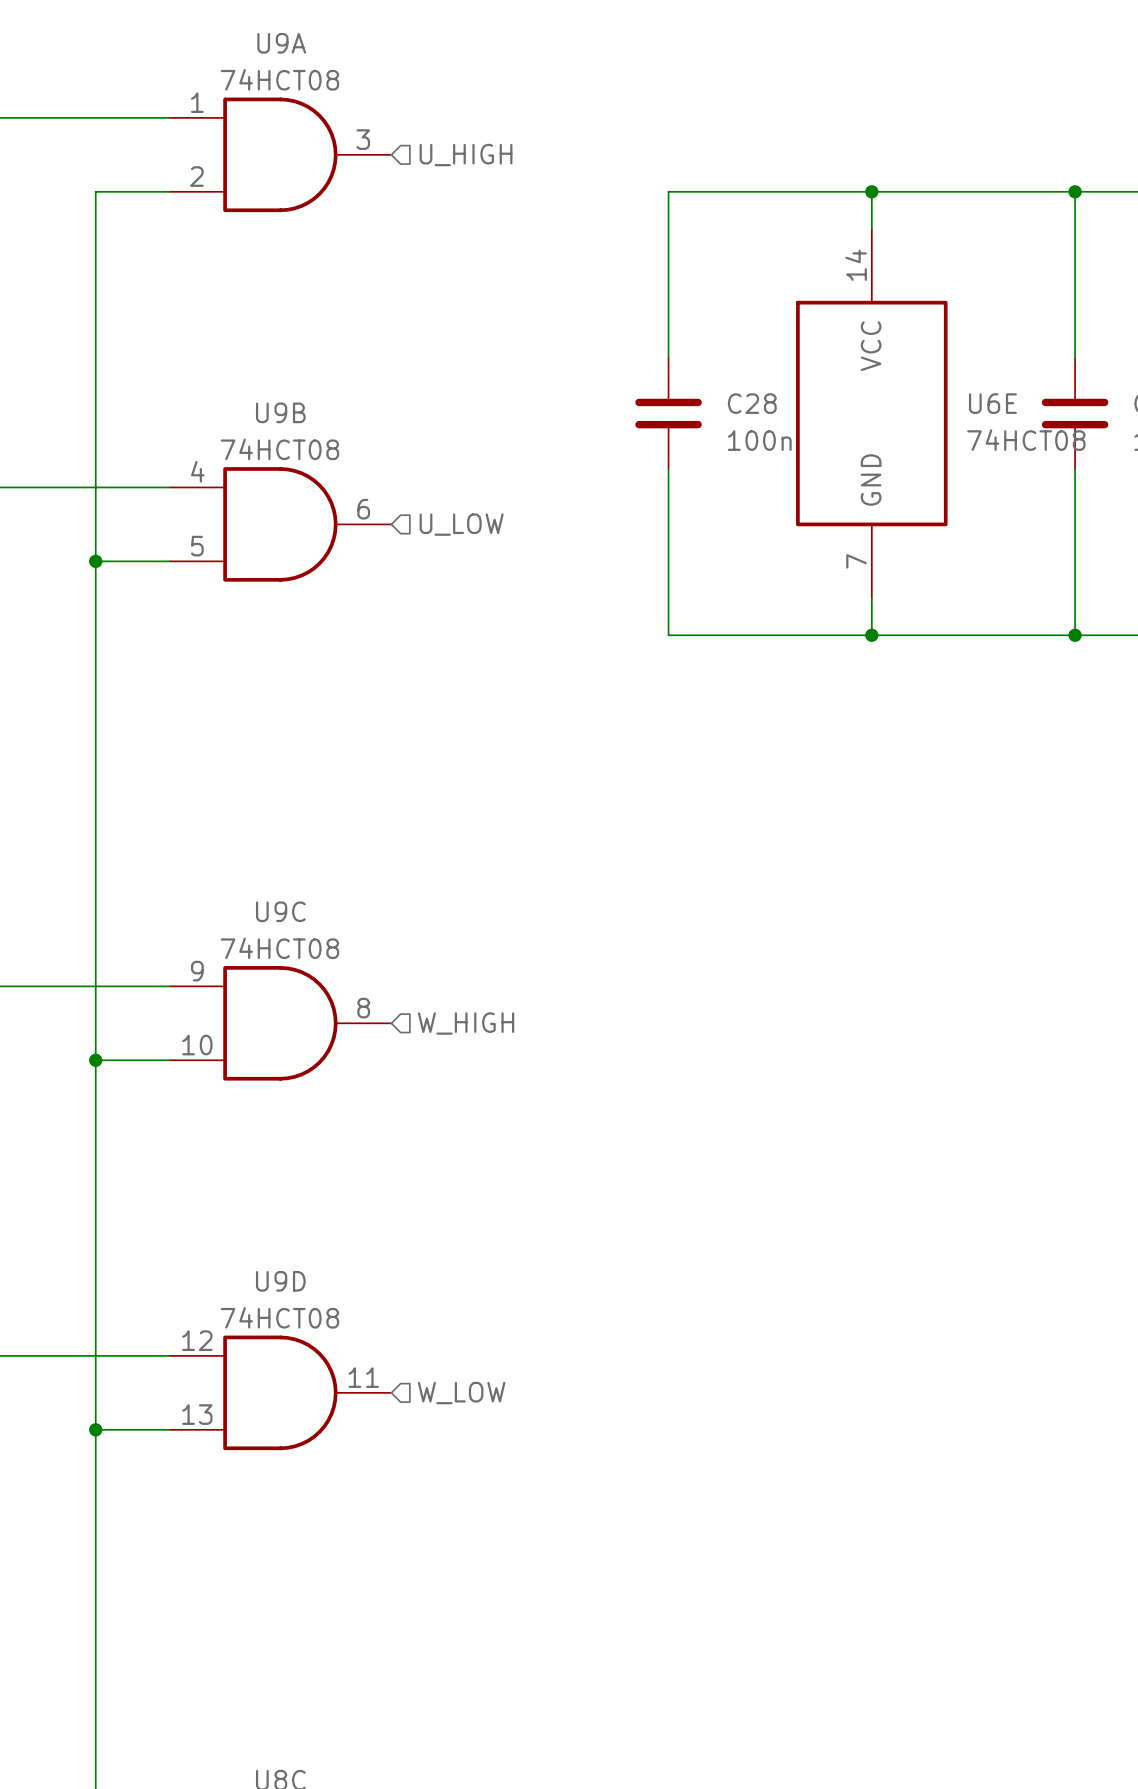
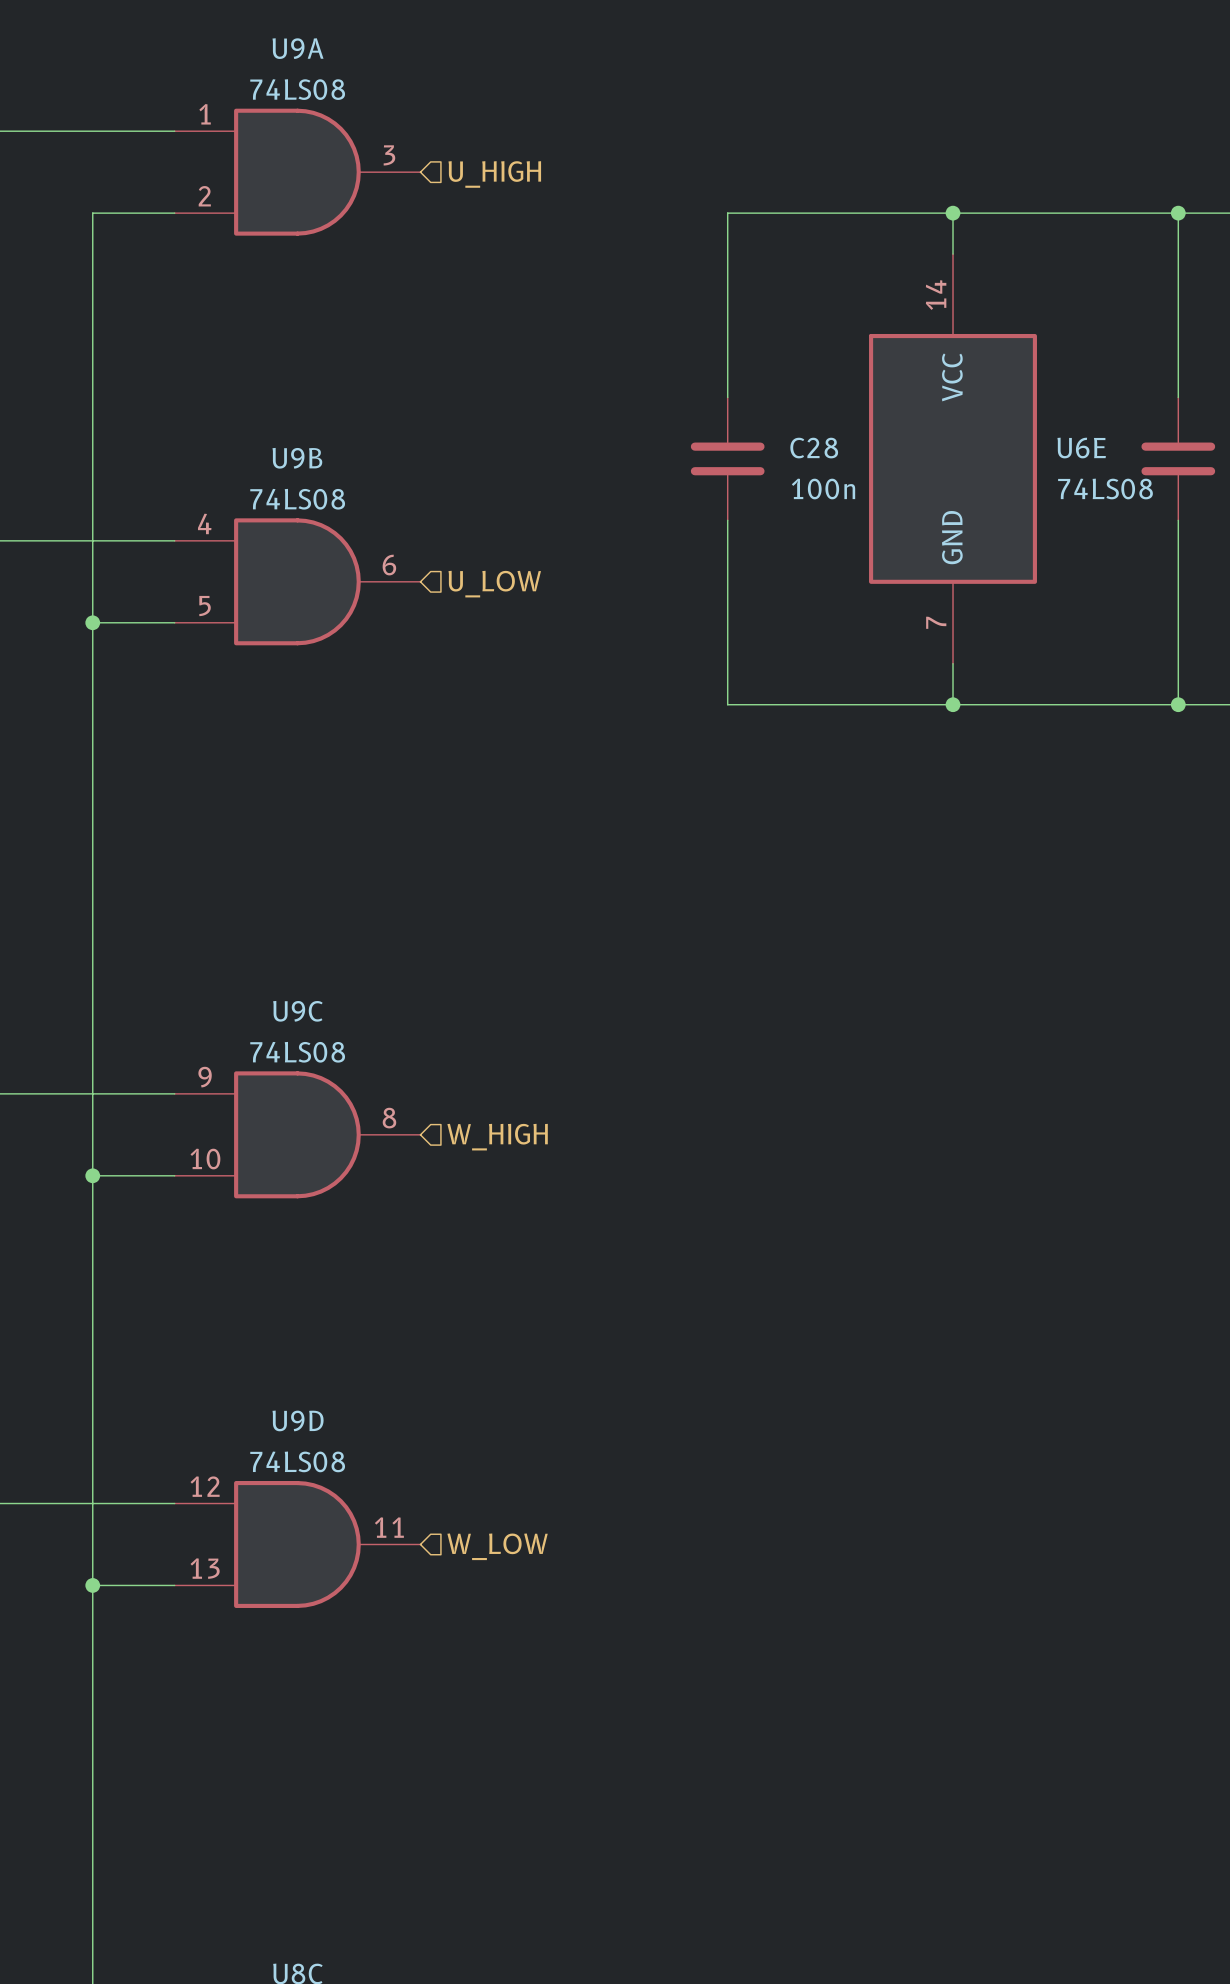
U9A value: 74HCT08 (279, 79) -> 74LS08 (297, 89)
U6E value: 74HCT08 (1026, 440) -> 74LS08 (1105, 488)
U9B value: 74HCT08 (279, 449) -> 74LS08 (297, 499)
U9C value: 74HCT08 (279, 948) -> 74LS08 (297, 1052)
U9D value: 74HCT08 (279, 1317) -> 74LS08 (297, 1461)

